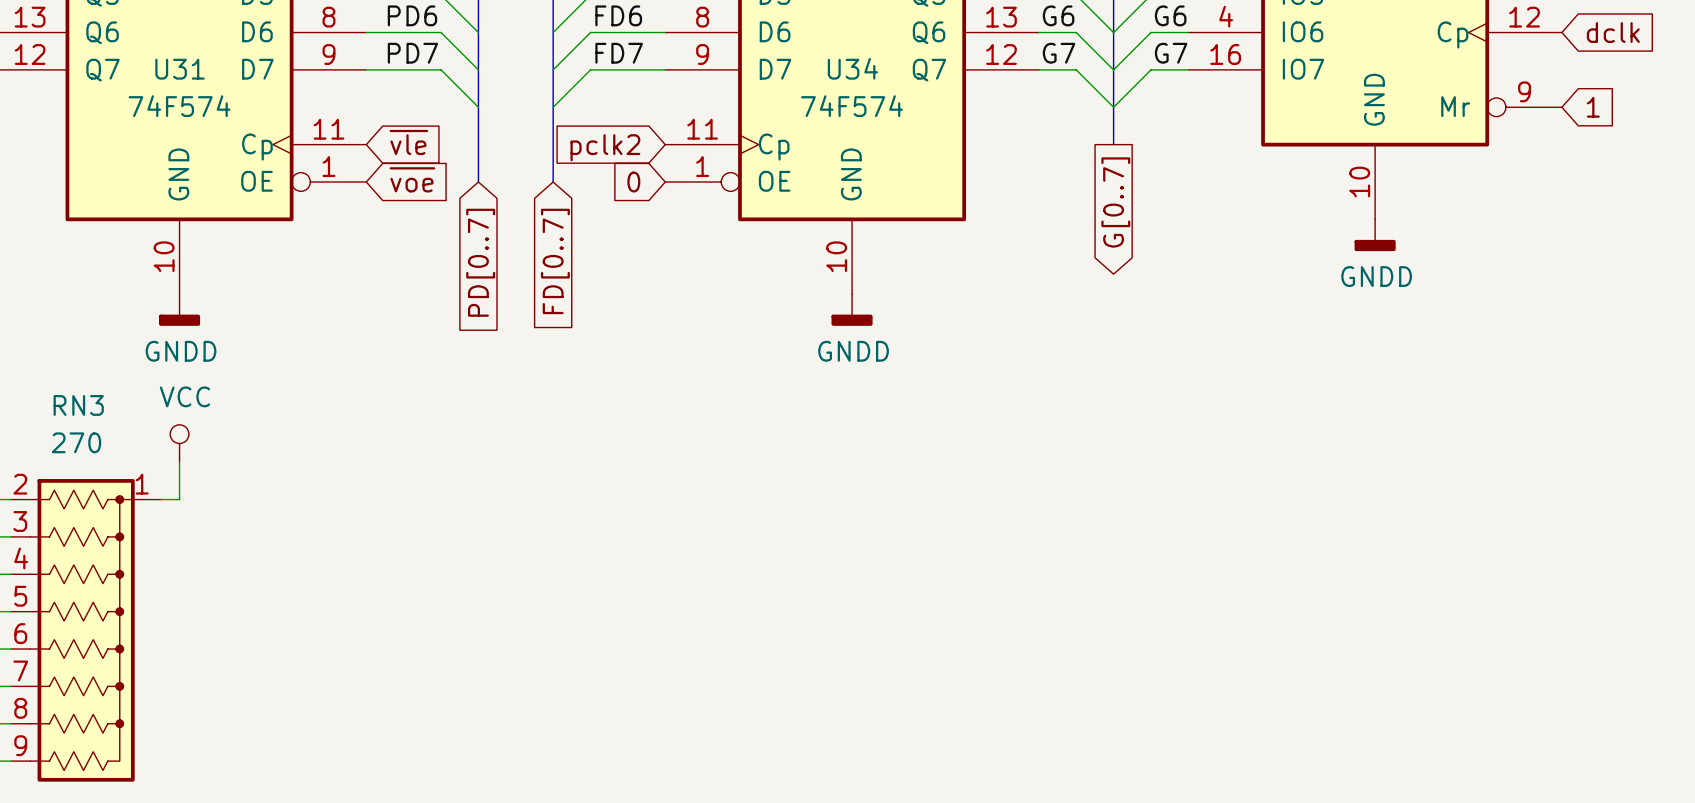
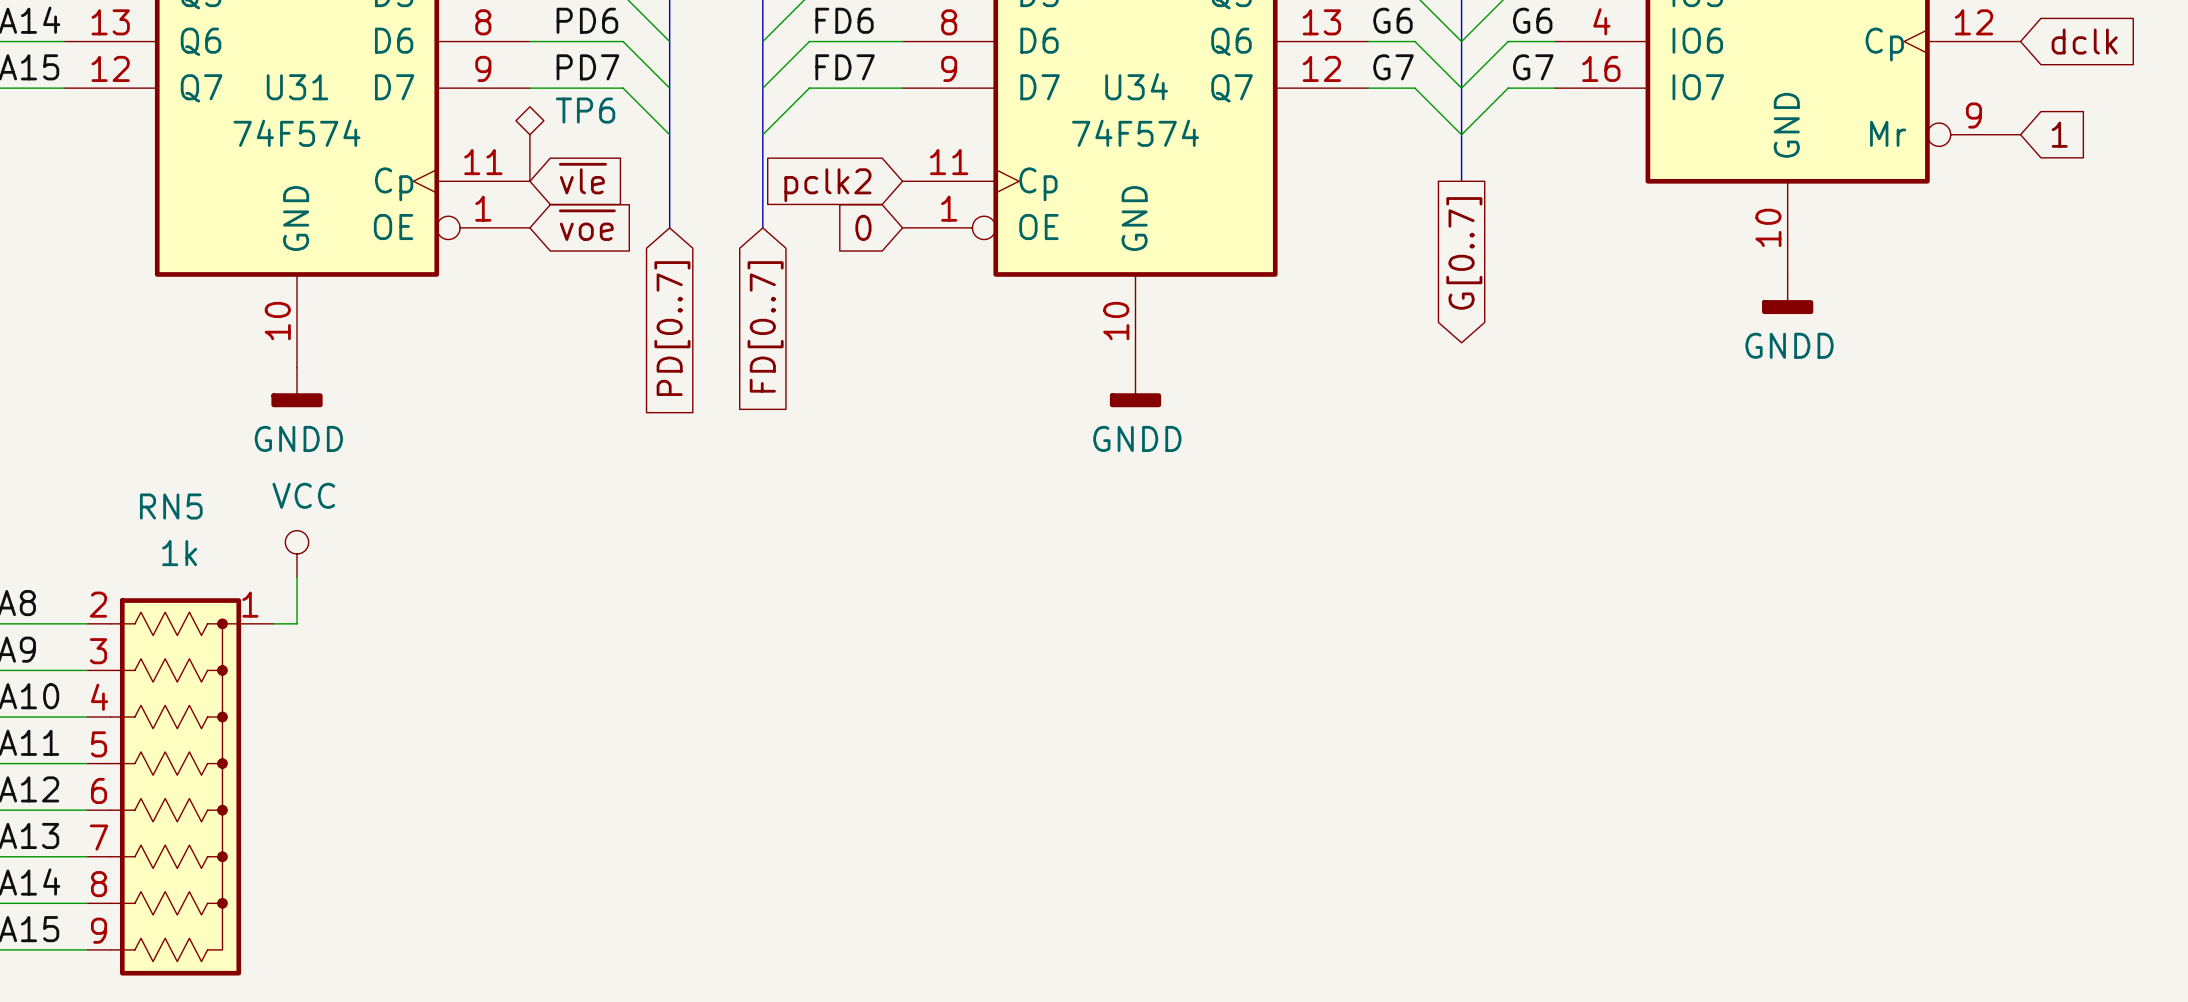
TP6: none -> (529, 144)
RN3 name: RN3 (78, 405) -> RN5 (171, 506)
RN3 value: 270 (76, 442) -> 1k (179, 553)

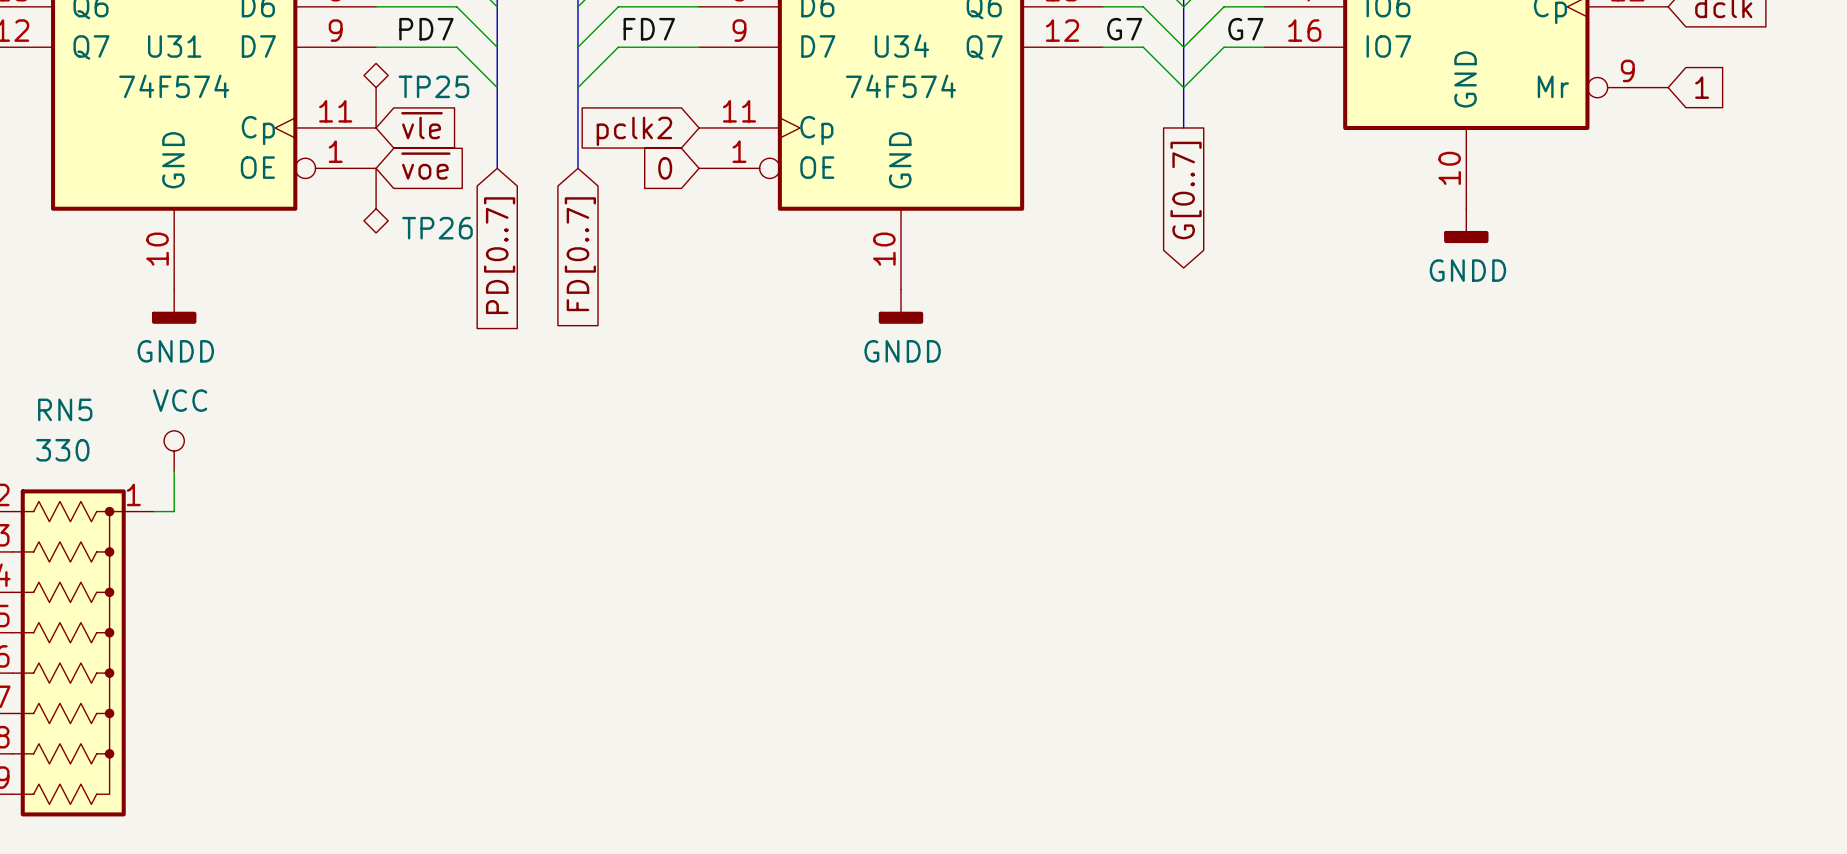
TP6 name: TP6 (585, 110) -> TP25 (433, 86)
TP26: none -> (376, 200)
RN5 value: 1k (179, 553) -> 330 (62, 450)

